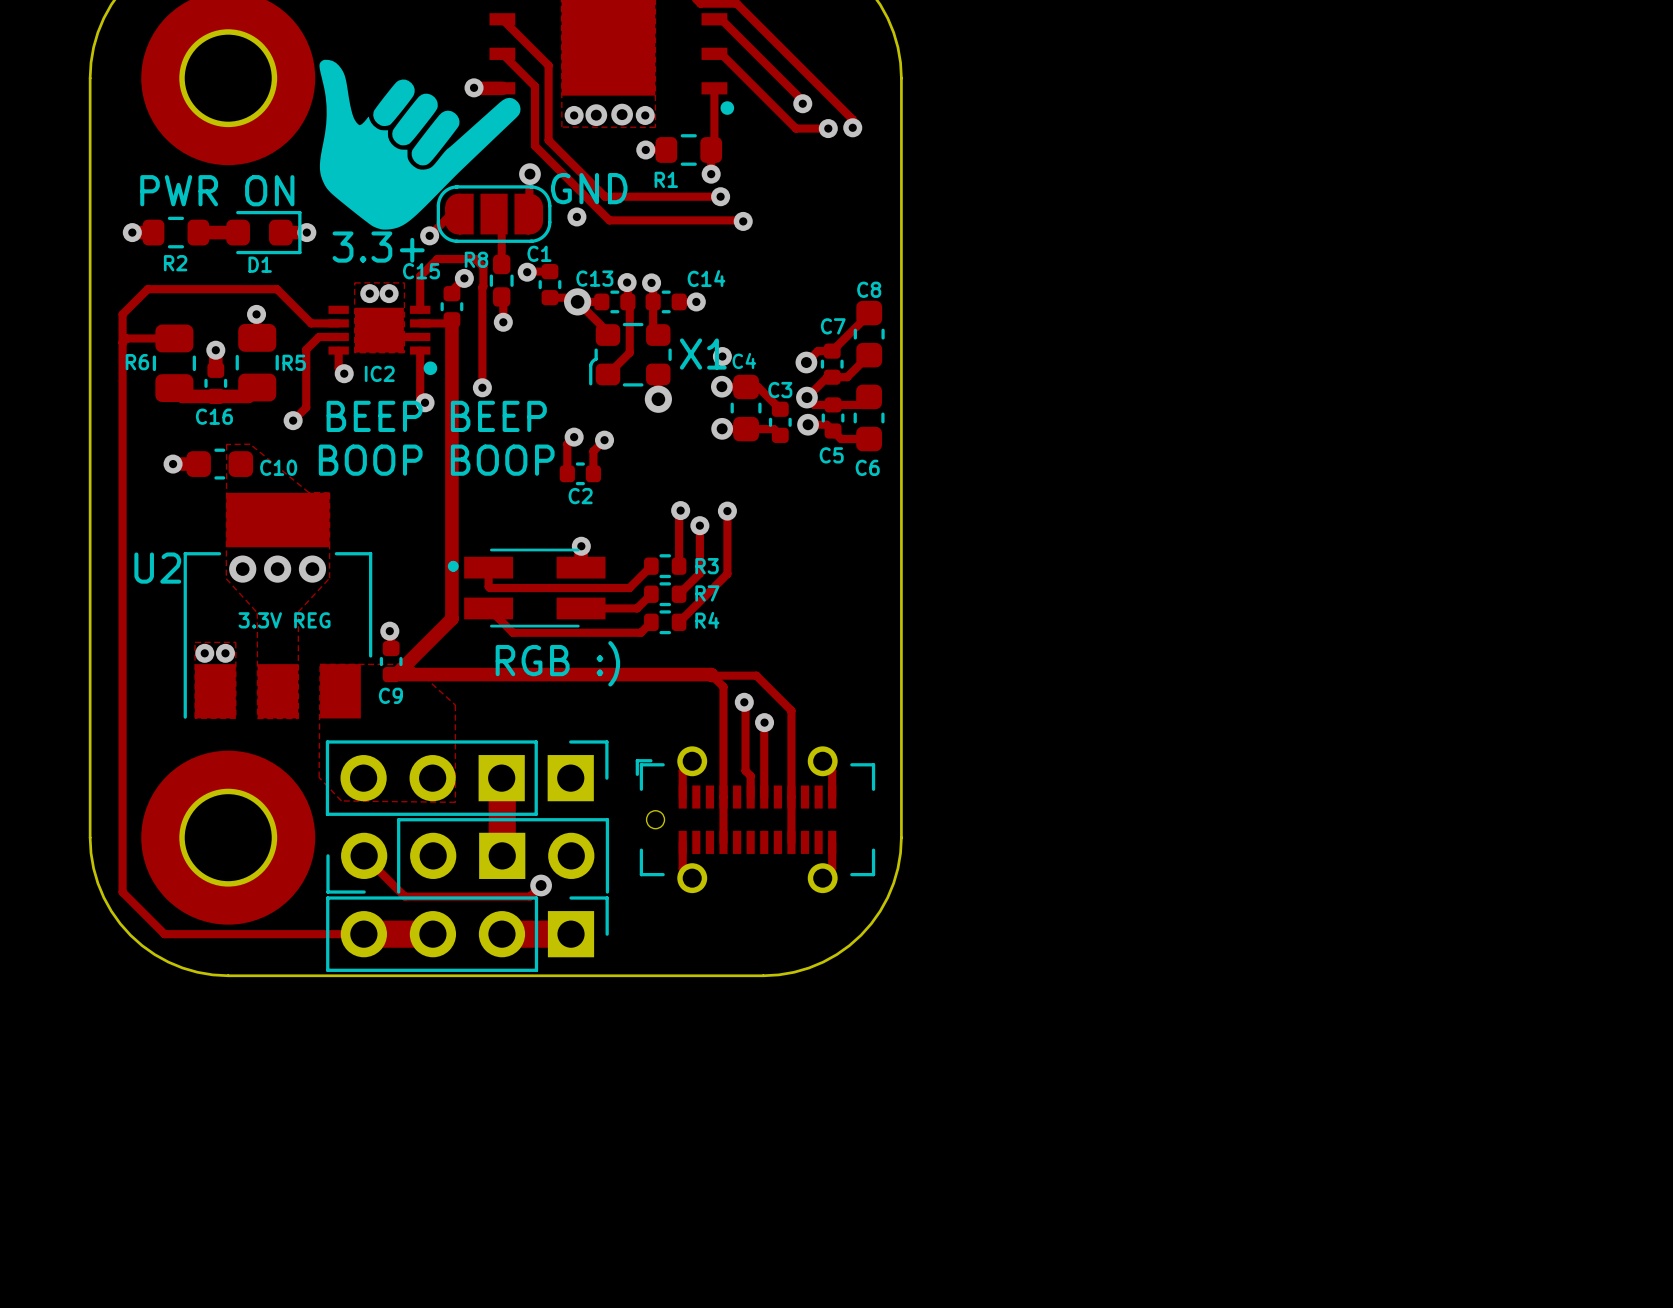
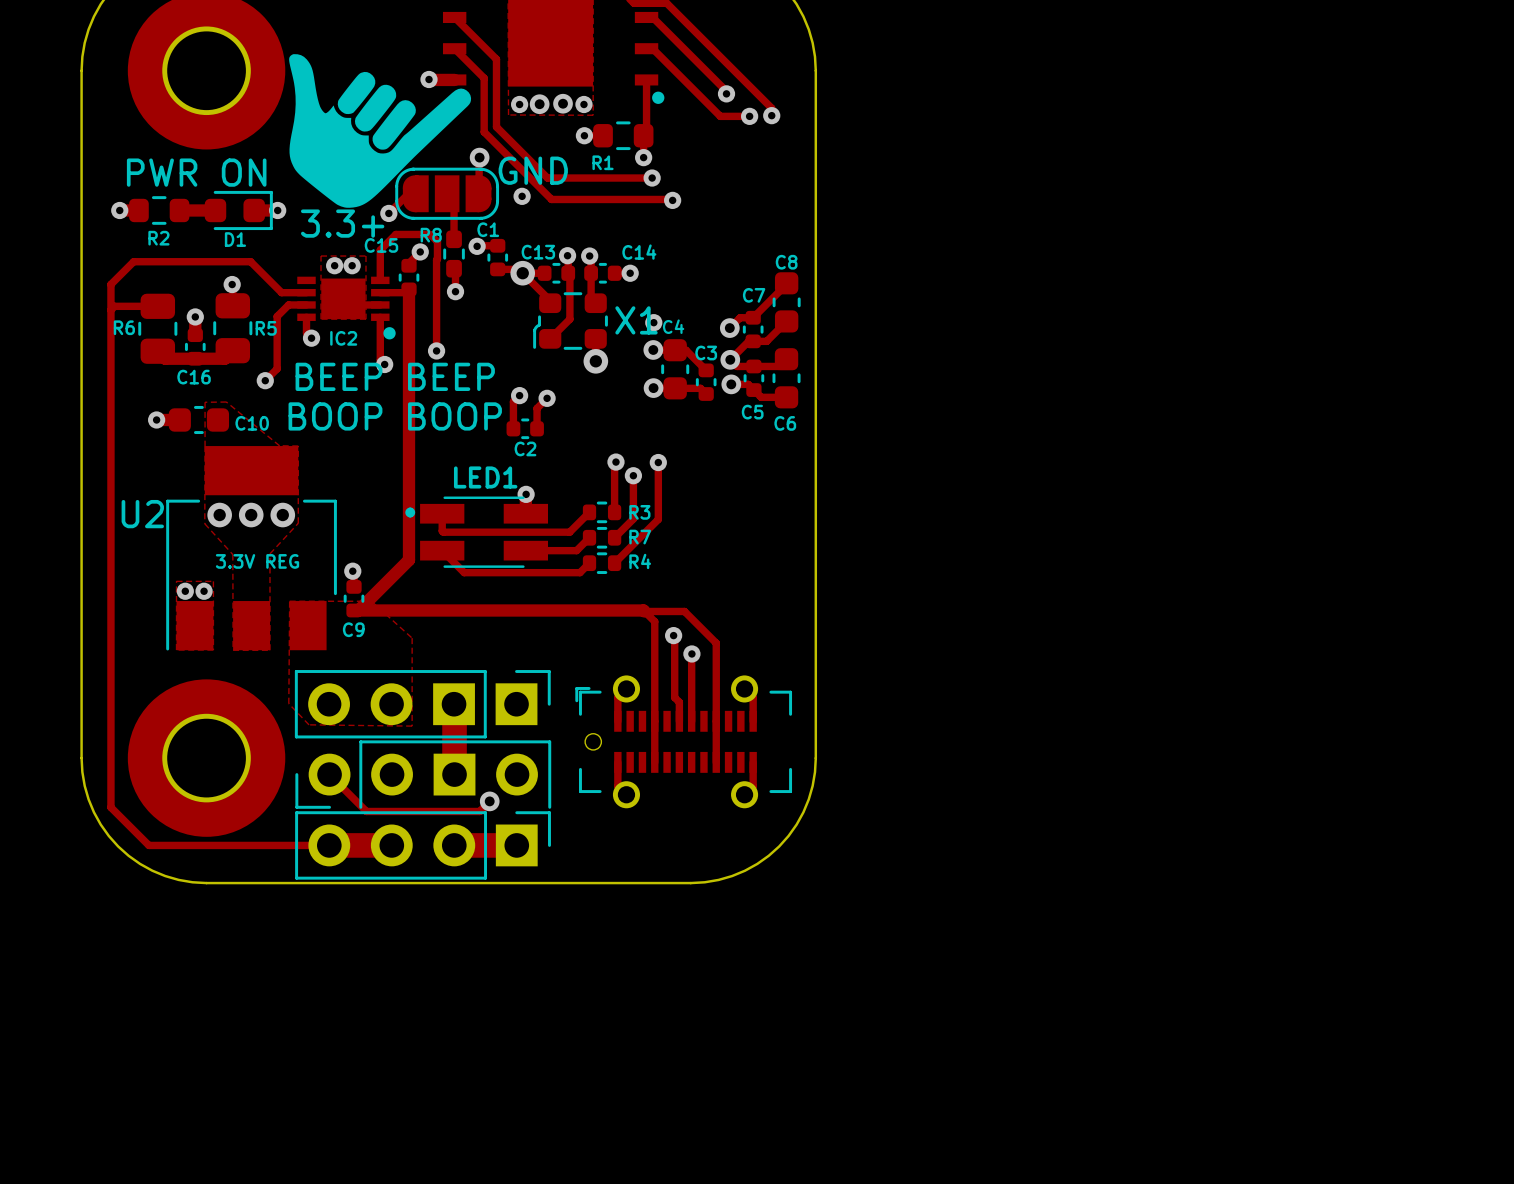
LED1 name: none -> LED1 (485, 477)
text: RGB :) (557, 663) -> none

